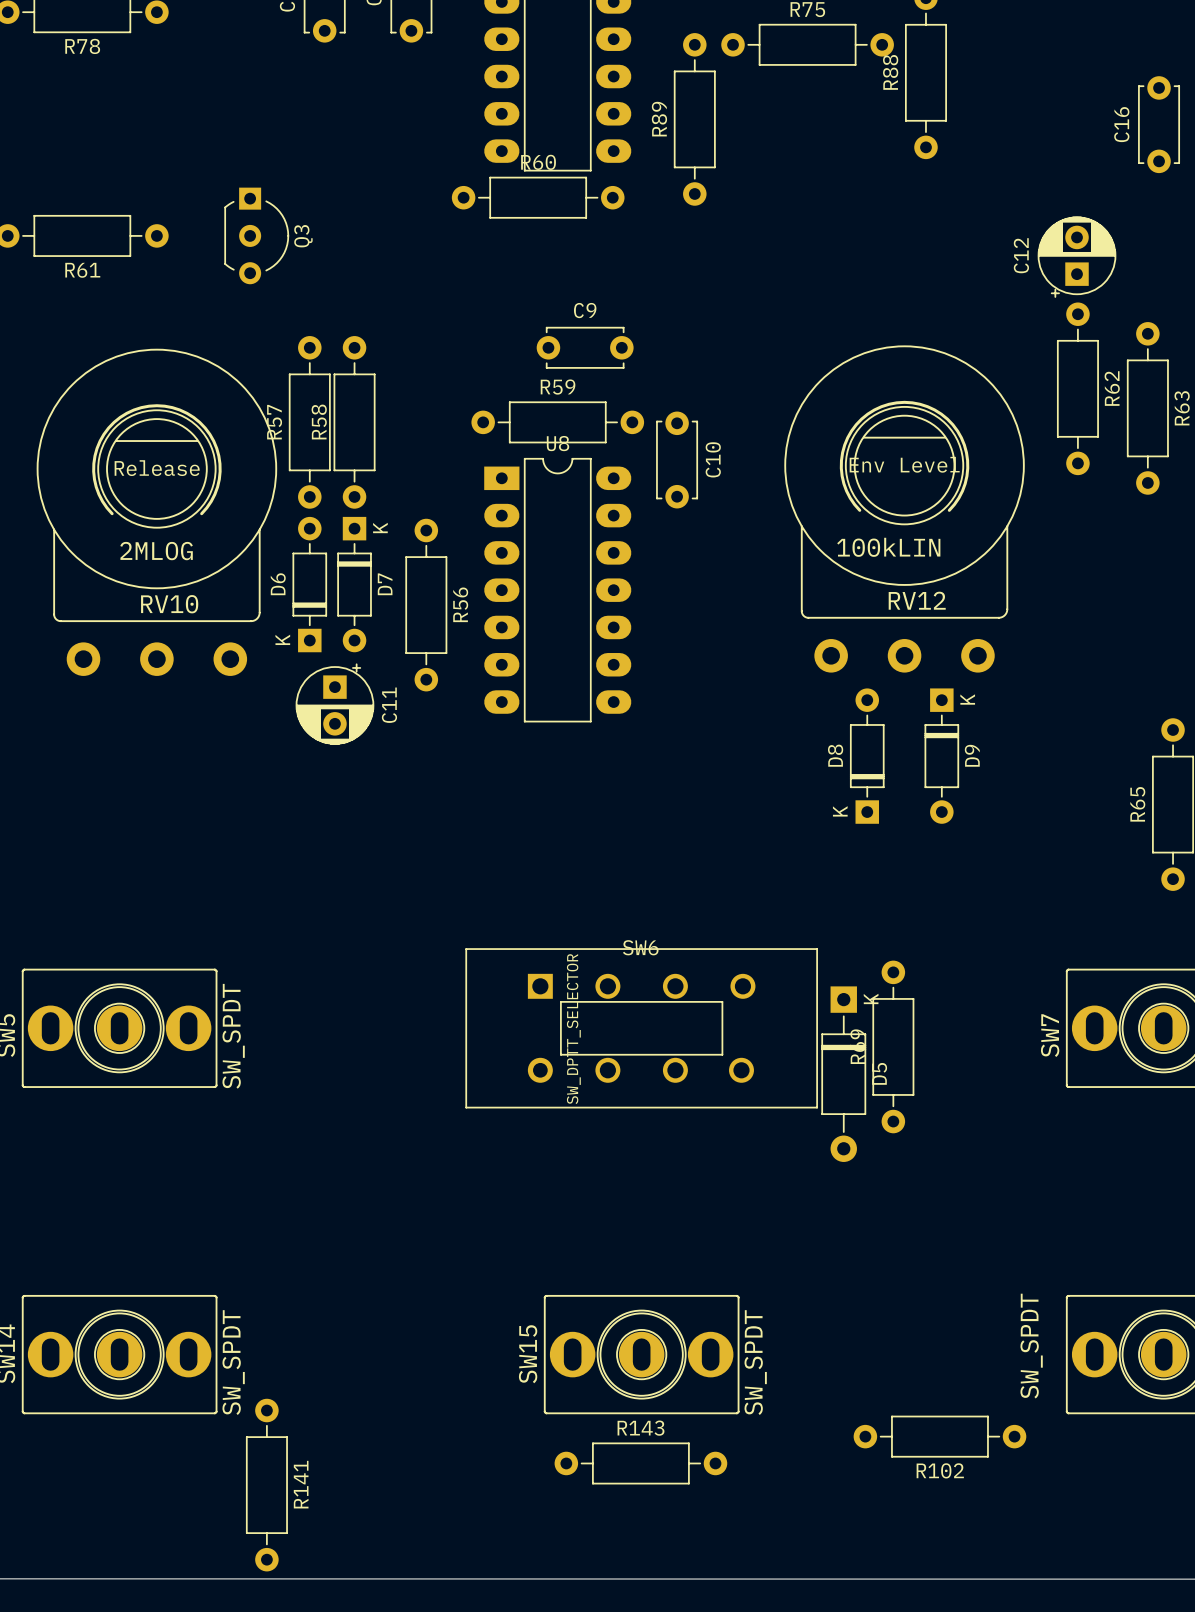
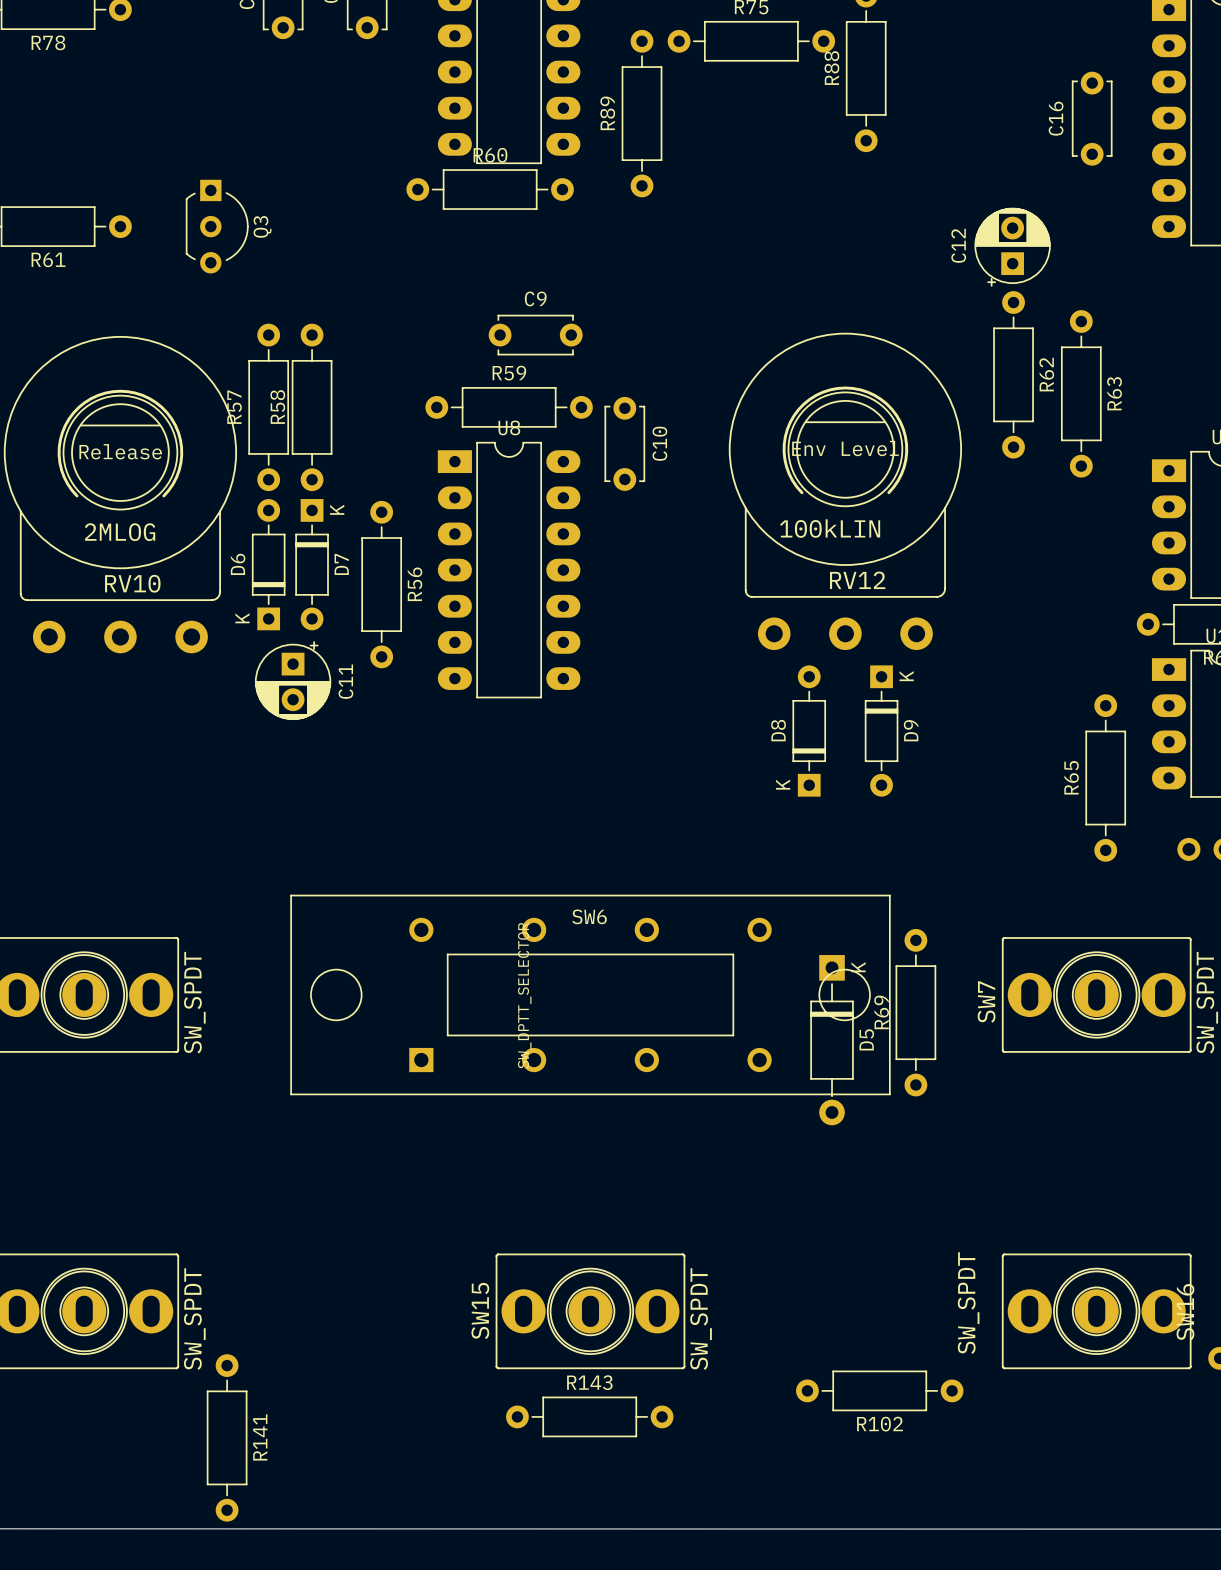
SW6 footprint: [465, 948, 818, 1109] -> [290, 894, 891, 1096]
R69 position: (893, 1046) -> (915, 1012)
D5 position: (843, 1074) -> (832, 1040)

